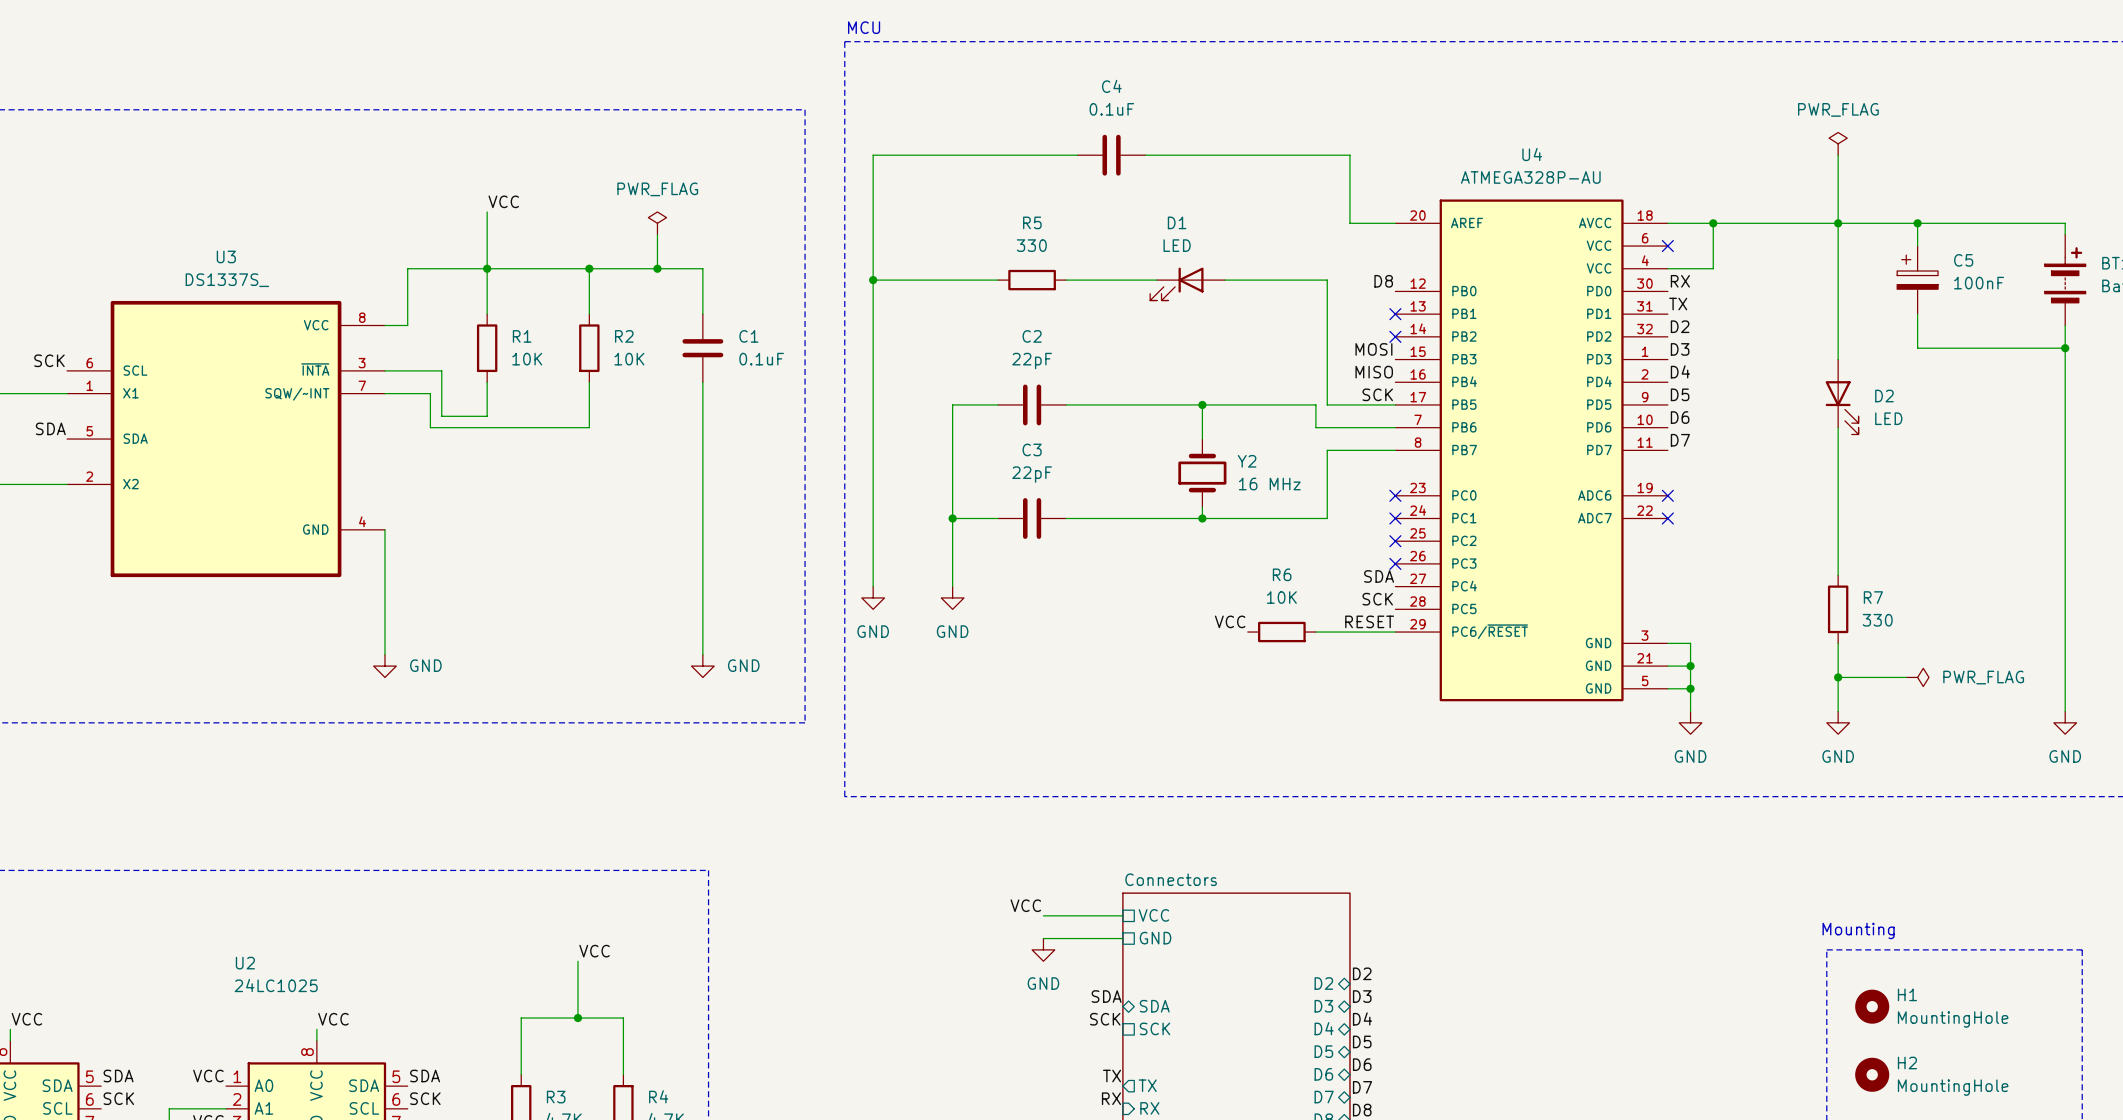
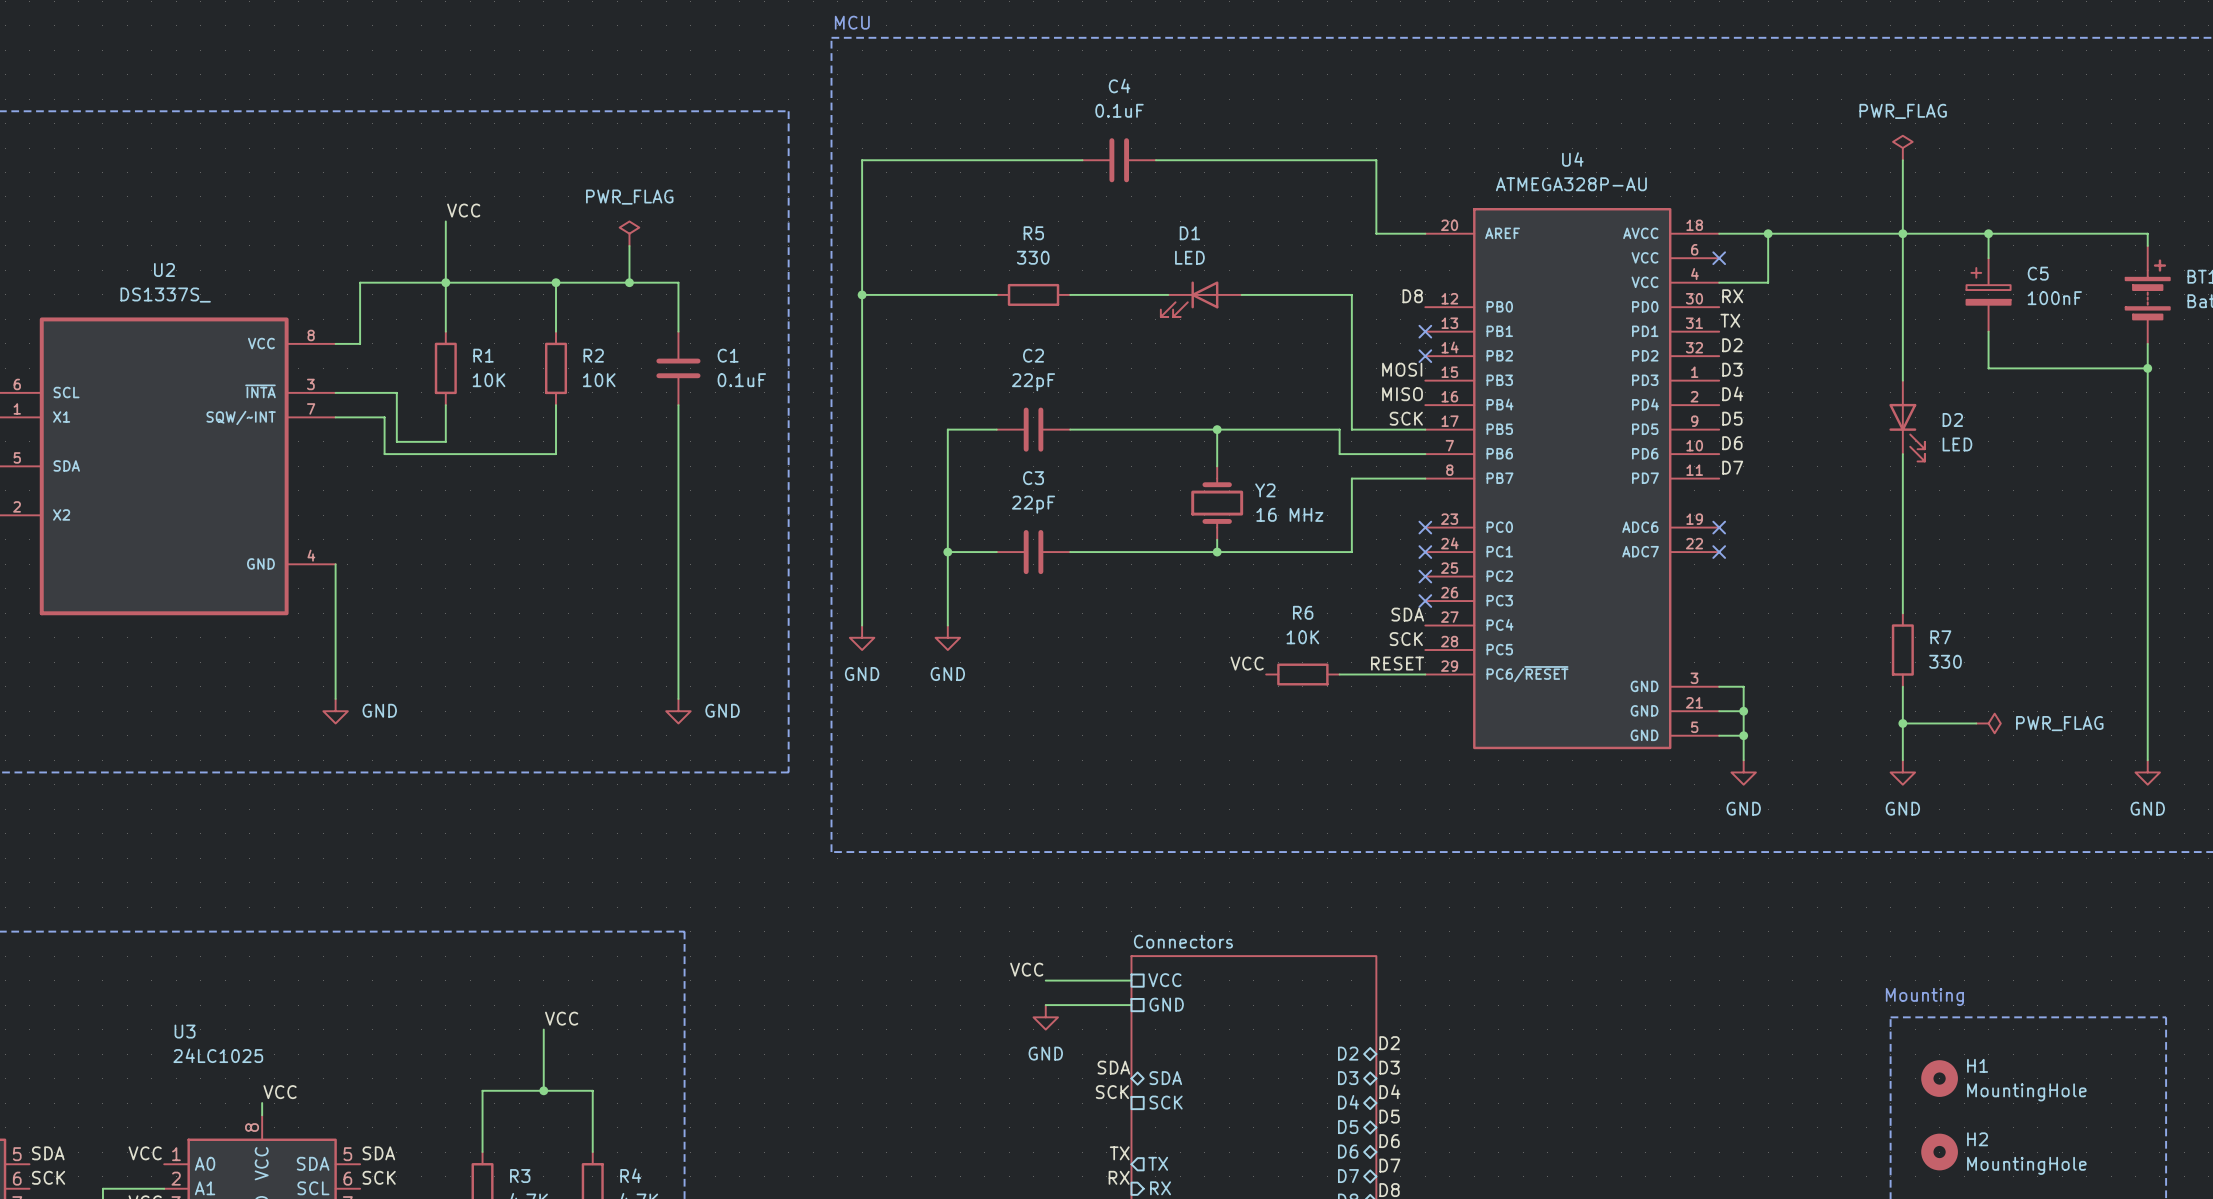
U3 name: U3 (226, 256) -> U2 (164, 269)
U2 name: U2 (245, 963) -> U3 (185, 1031)

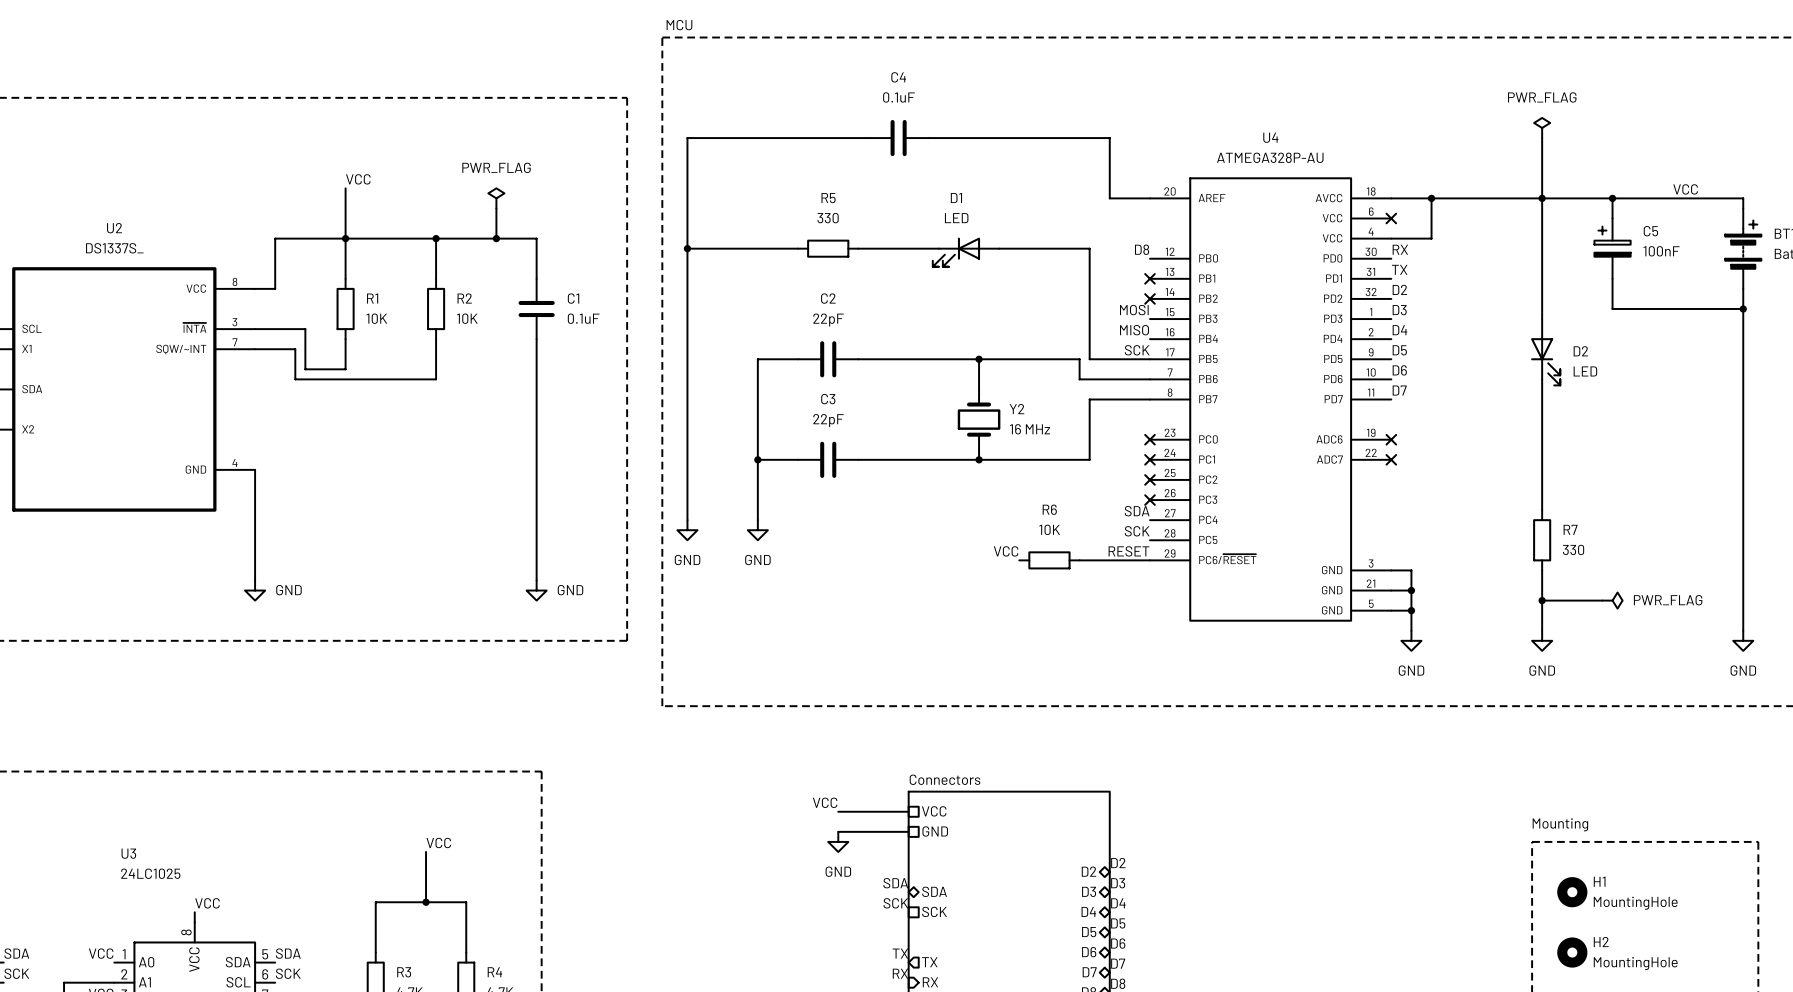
label: none -> VCC (1685, 189)

